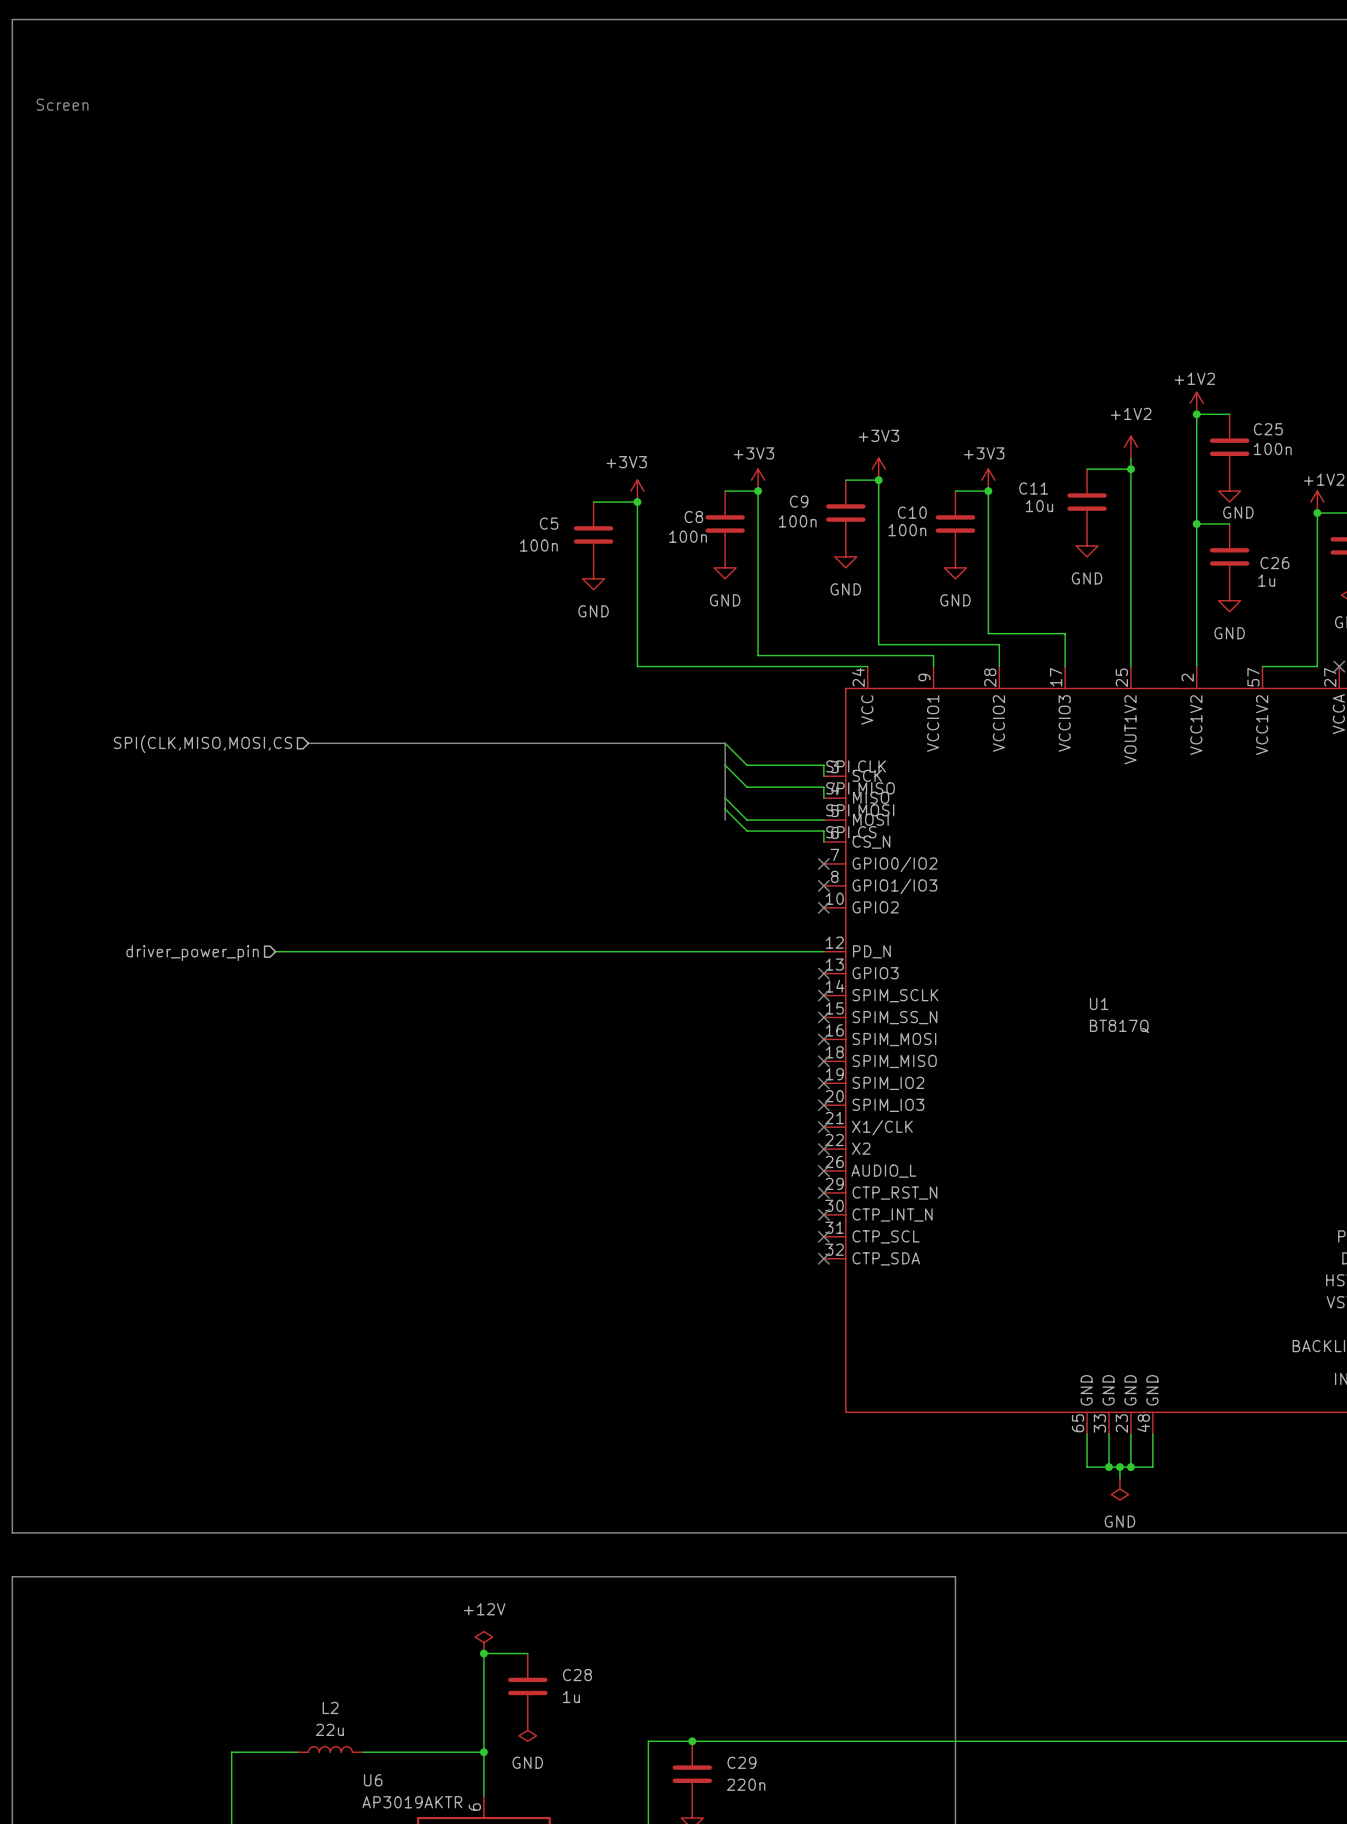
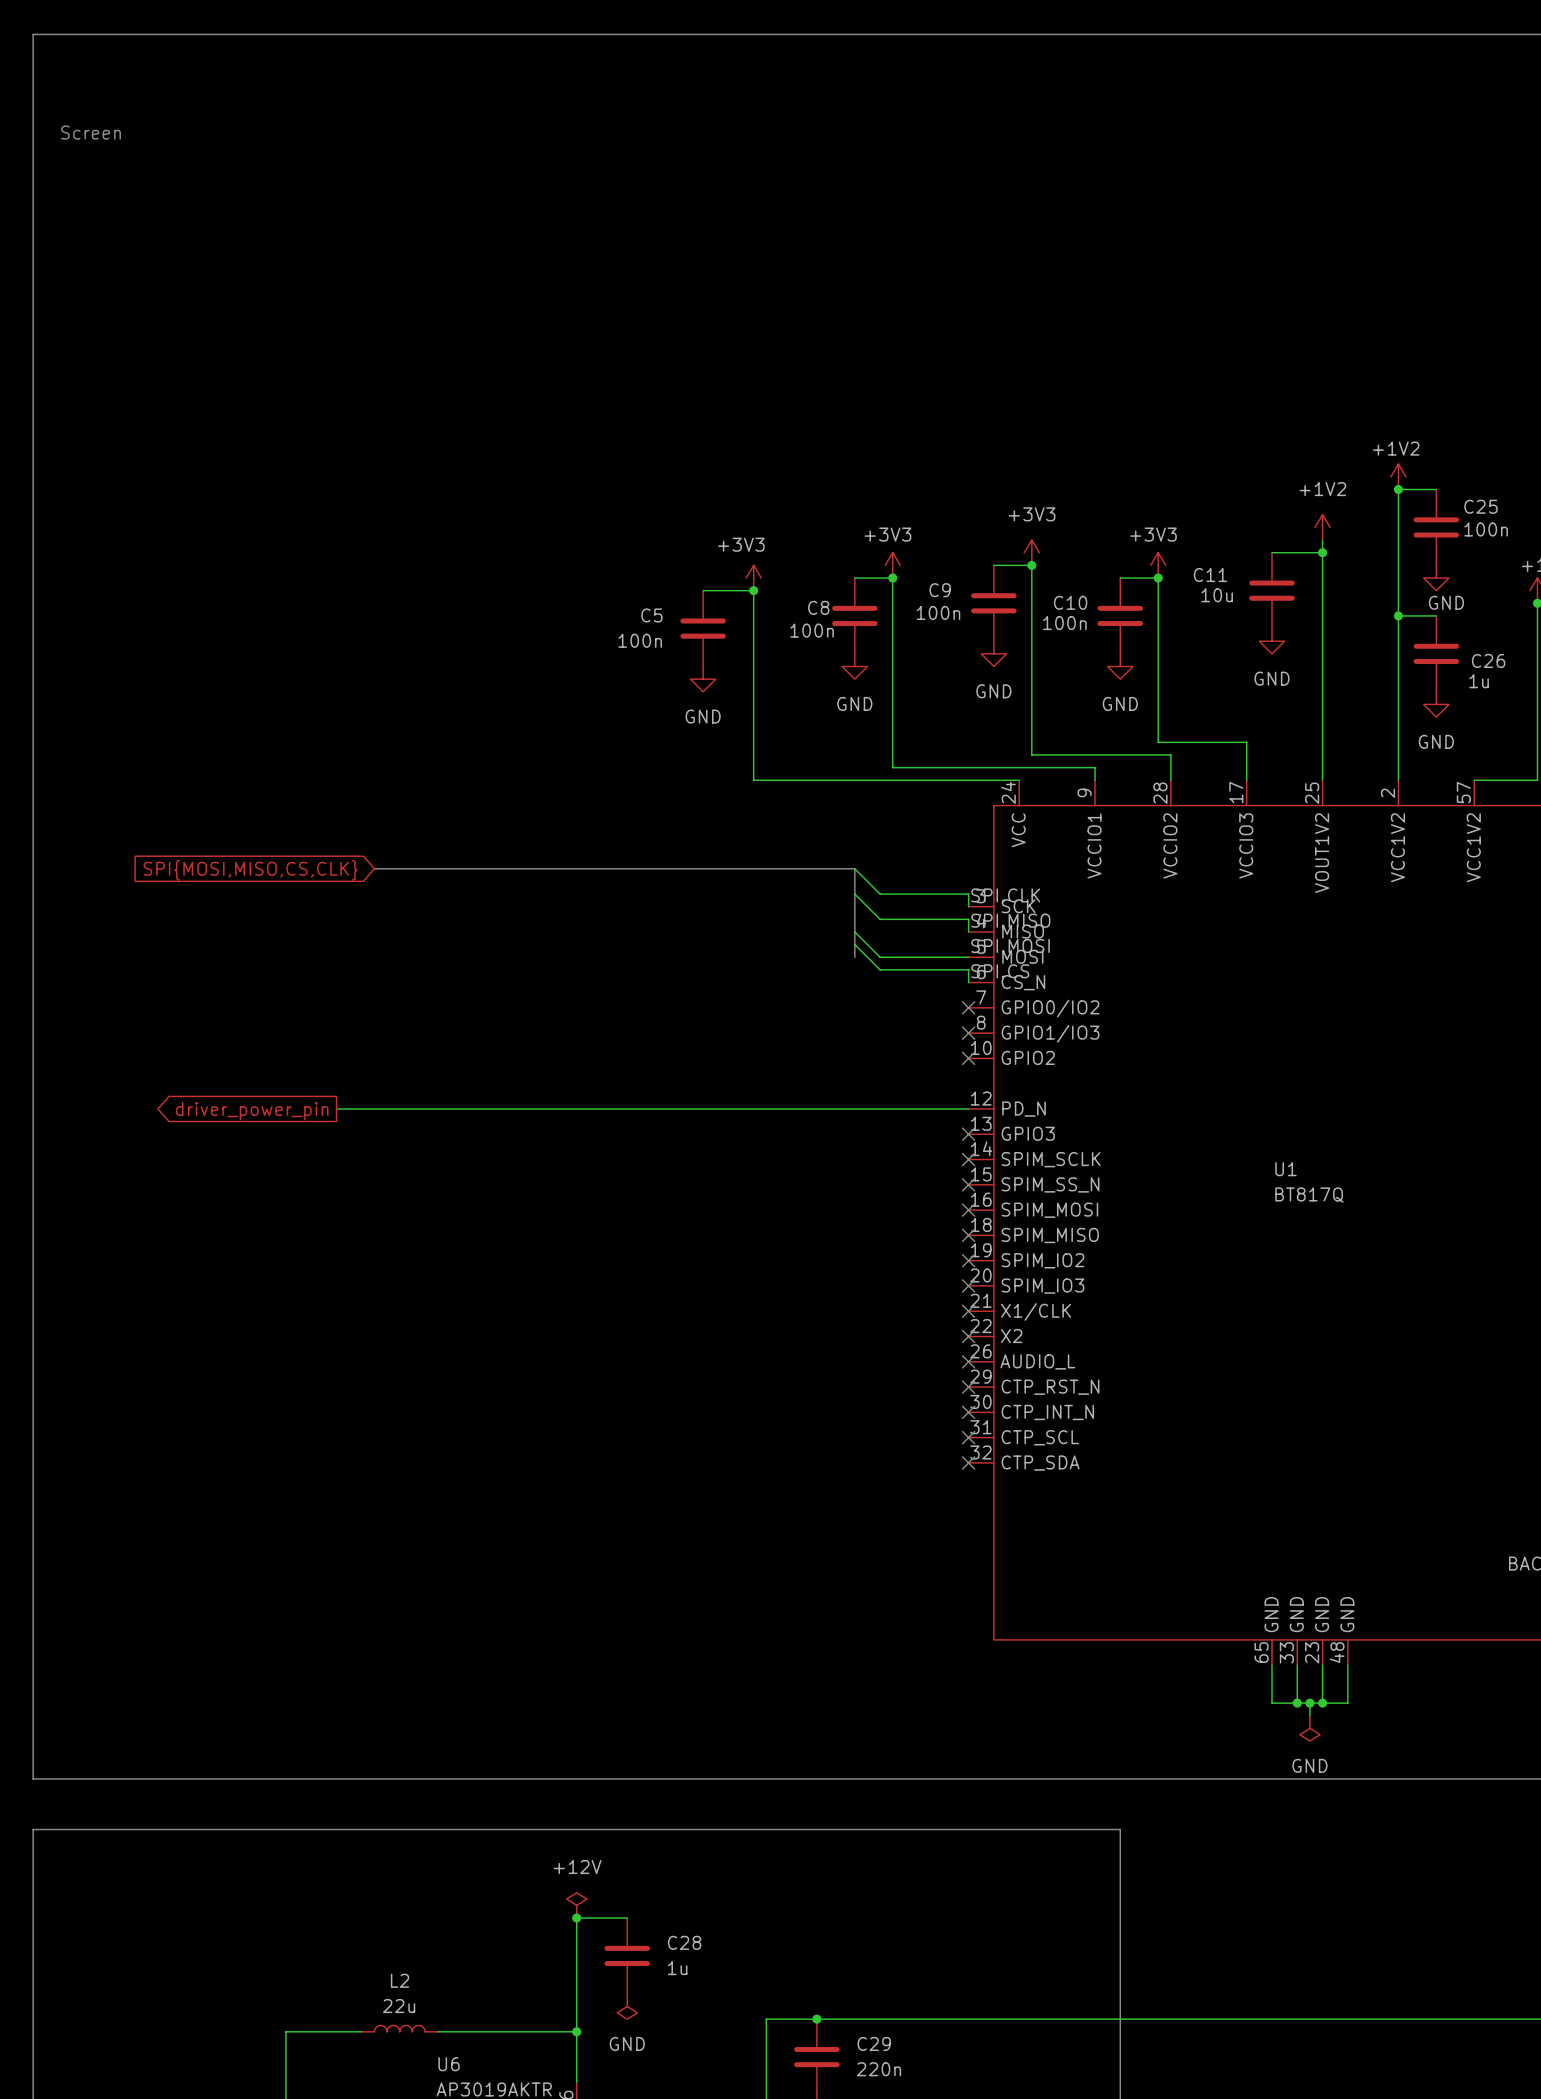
global label: none -> SPI{MOSI,MISO,CS,CLK} (250, 870)
hierarchical label: SPI(CLK,MISO,MOSI,CS (203, 744) -> none
hierarchical label: driver_power_pin (192, 953) -> none
global label: none -> driver_power_pin (252, 1111)

